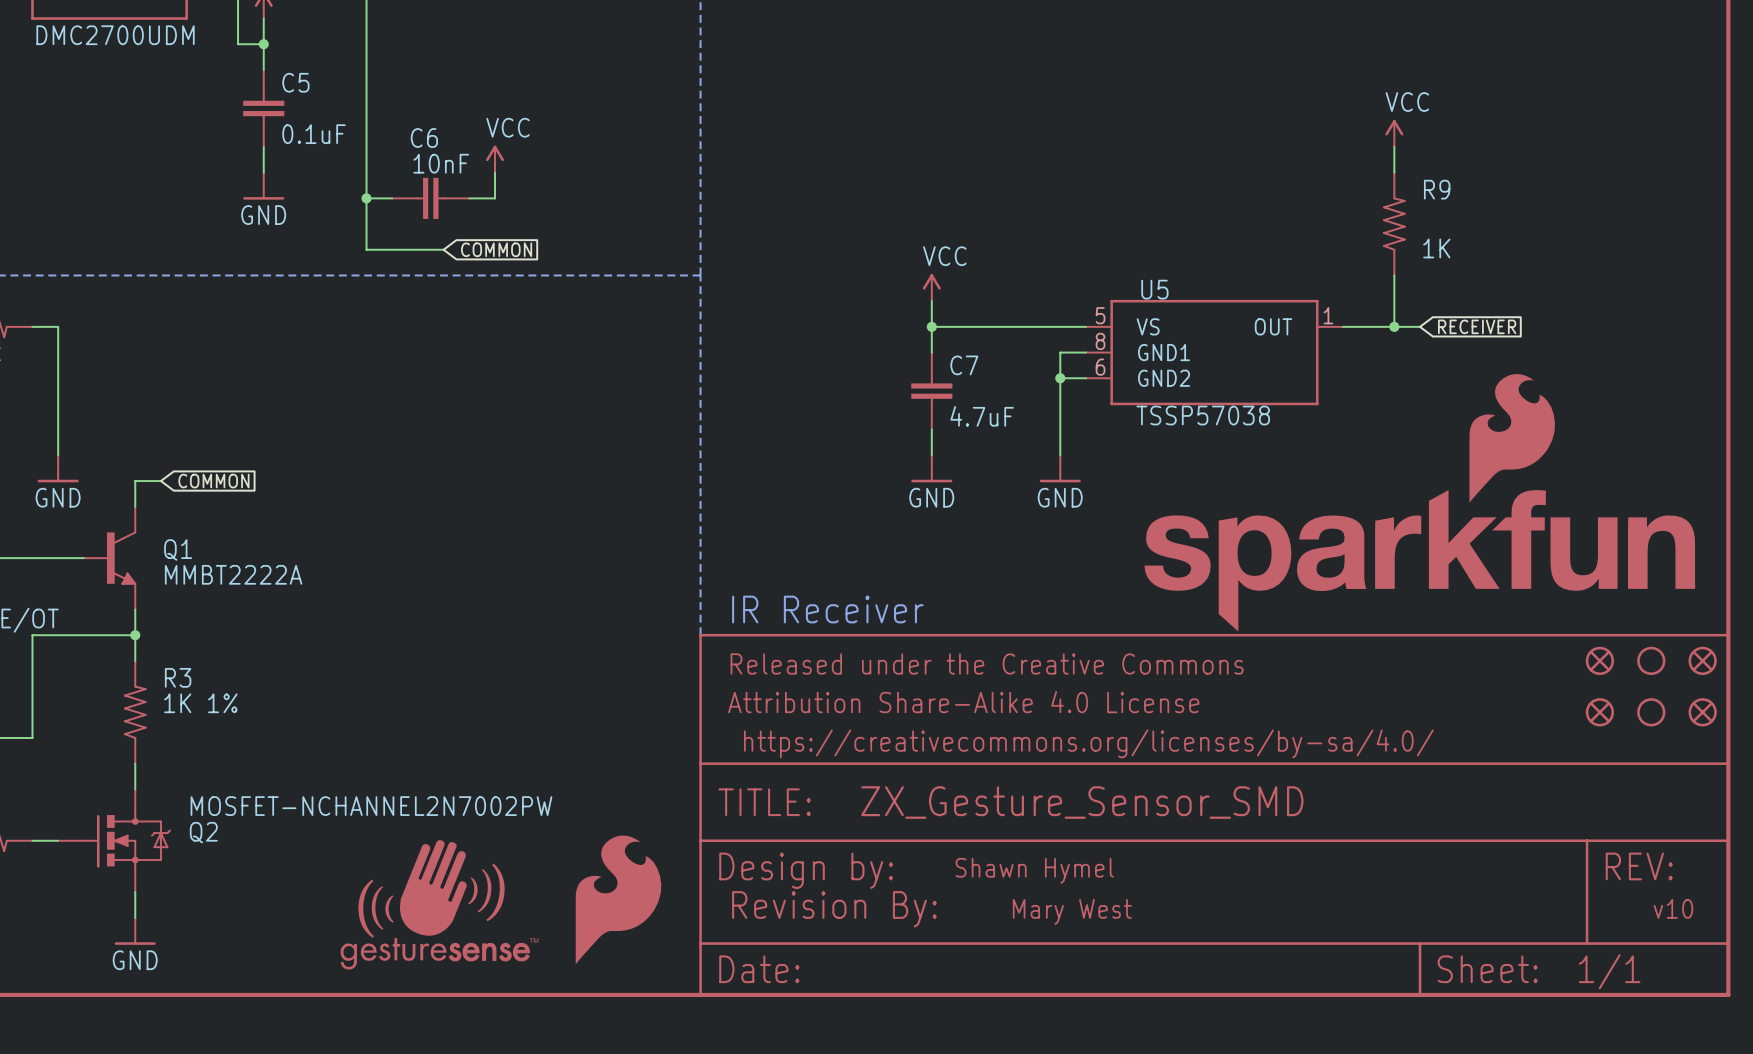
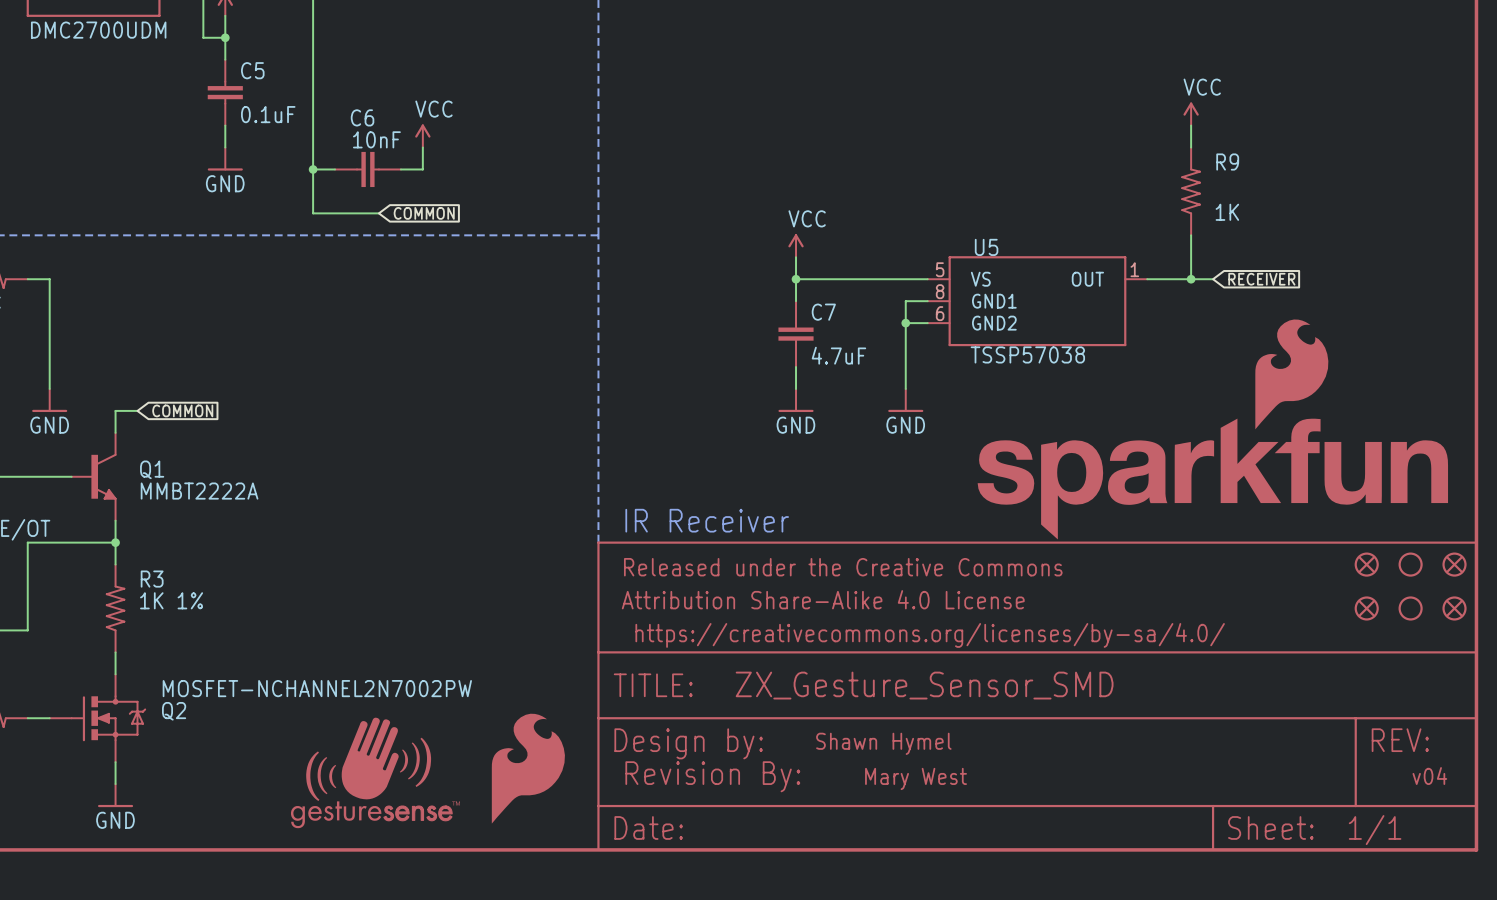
text: v10 (1673, 908) -> v04 (1429, 776)

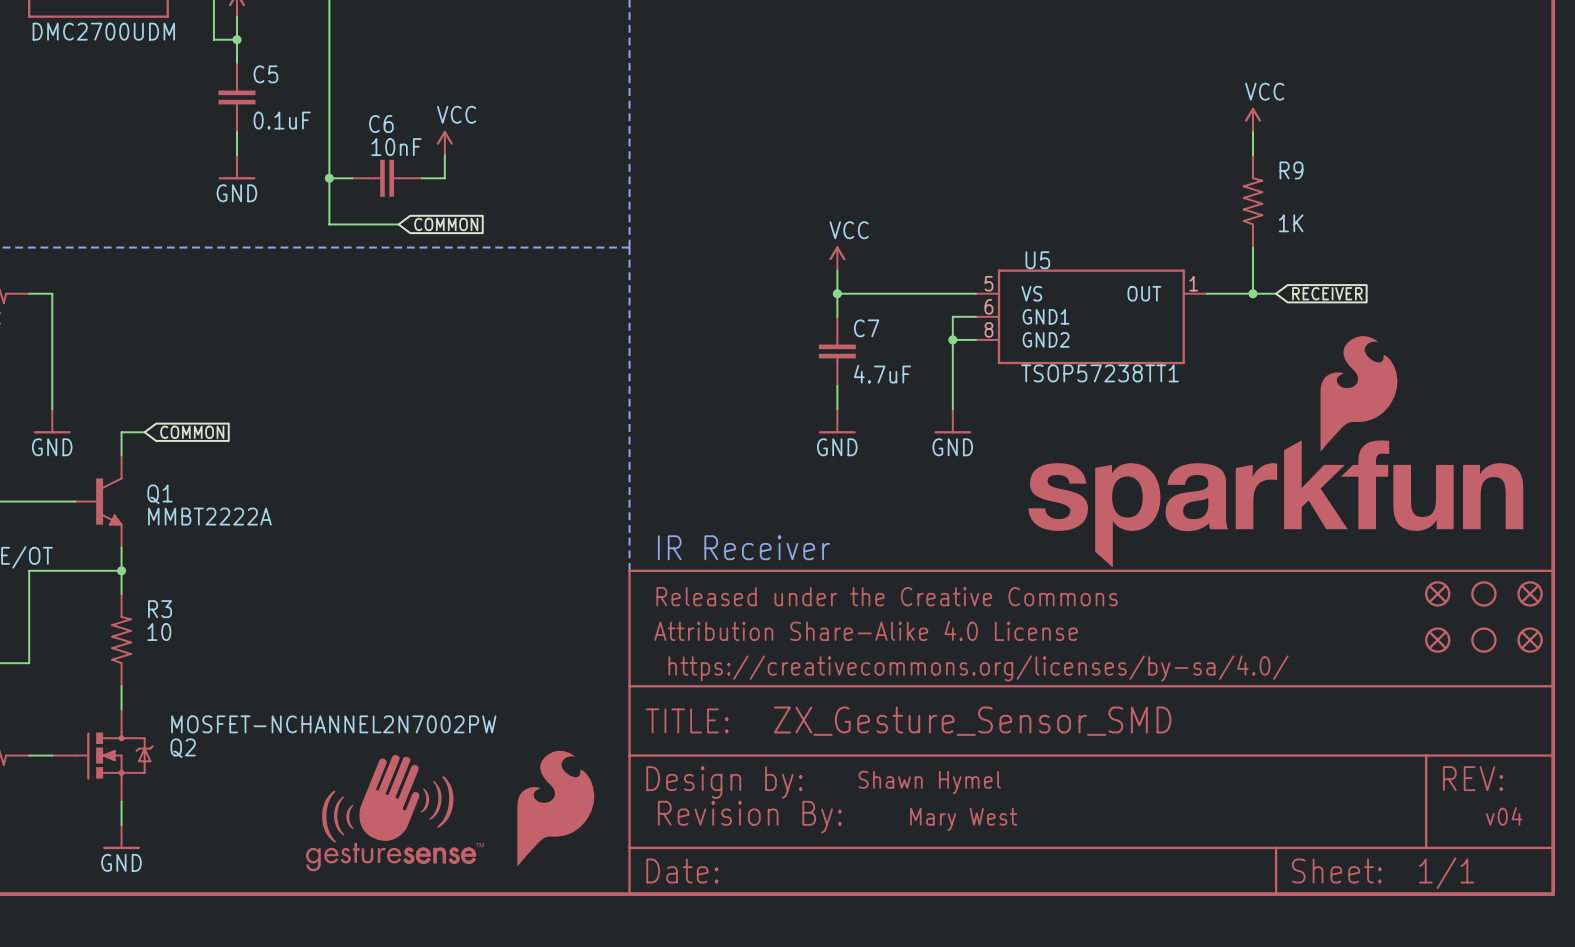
U5 pin number: 8 (940, 291) -> 6 (988, 306)
U5 pin number: 6 (940, 313) -> 8 (988, 329)
U5 value: TSSP57038 (1027, 354) -> TSOP57238TT1 (1099, 373)
R3 value: 1K 1% (171, 600) -> 10 (159, 632)

